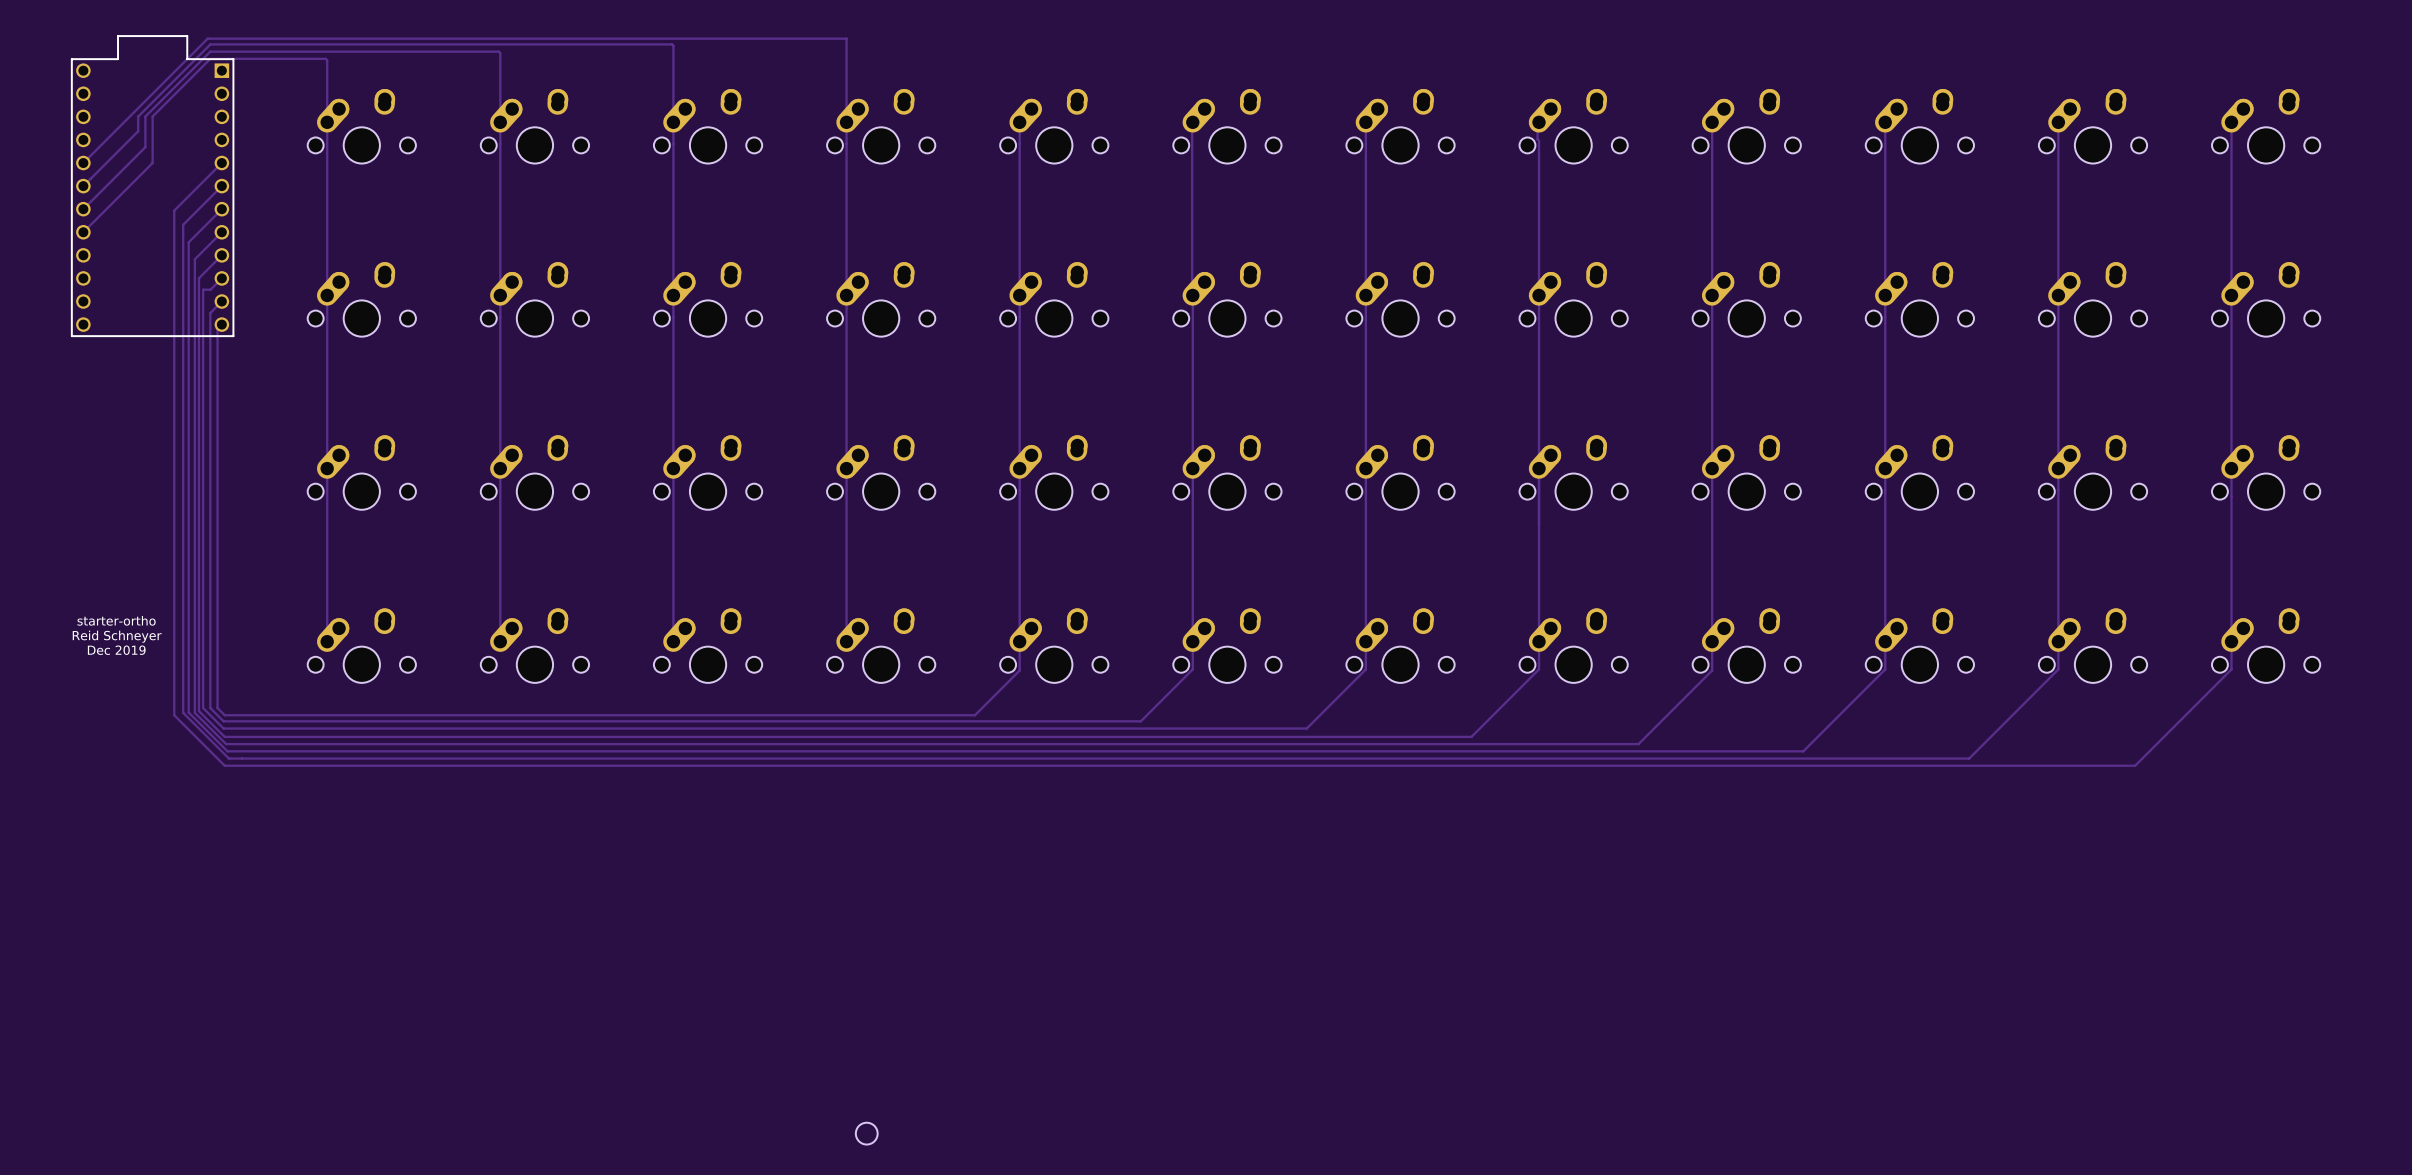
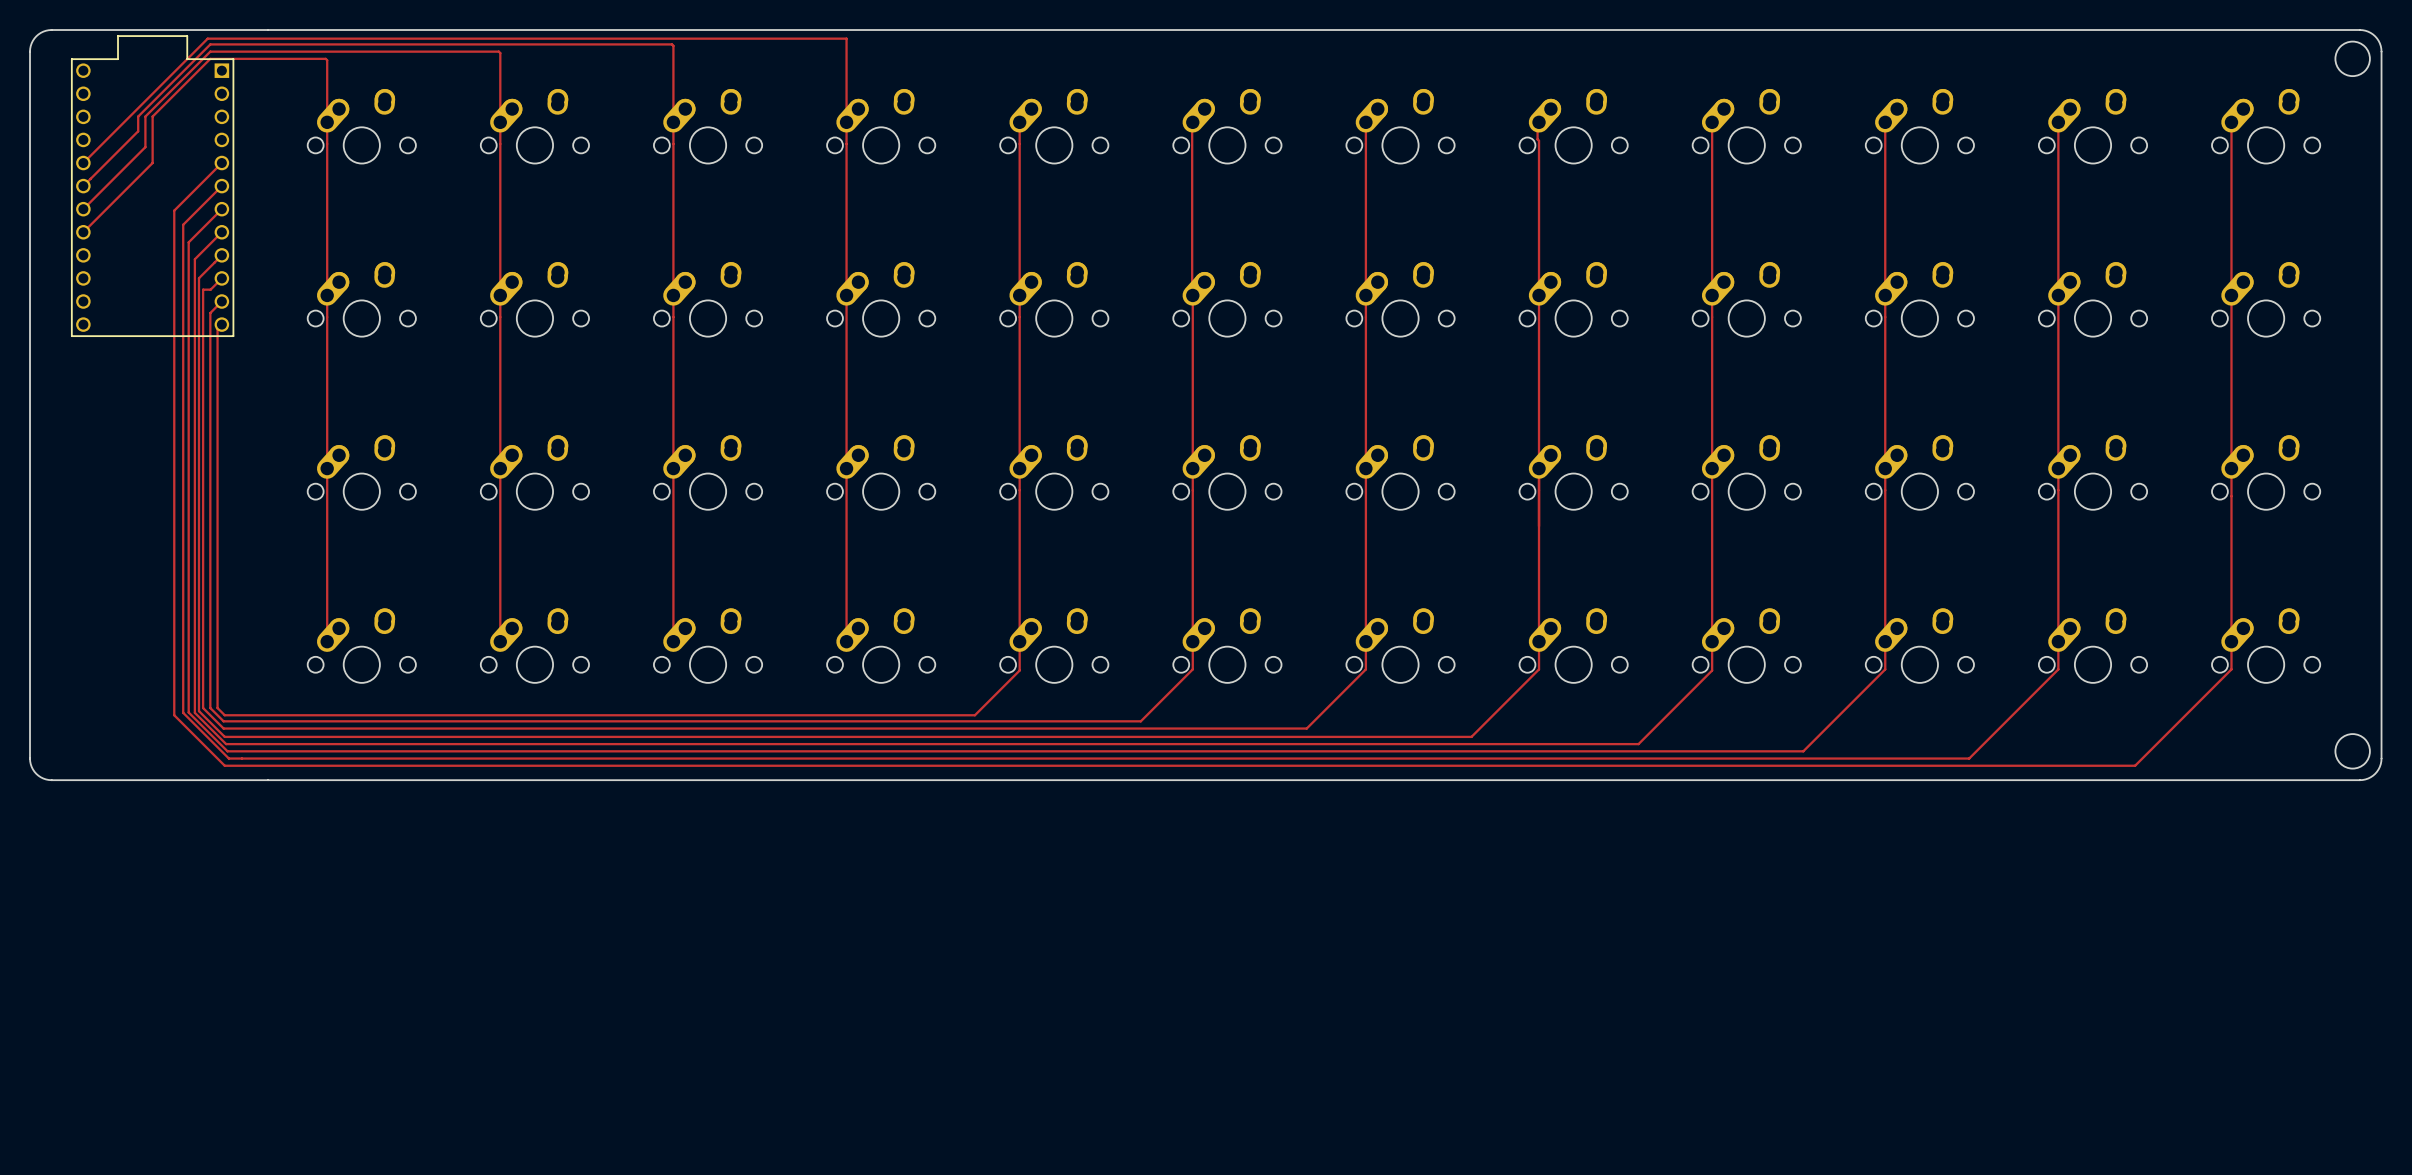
round board edge: none -> [2335, 41, 2371, 77]
text: starter-ortho (116, 620) -> none
text: Reid Schneyer (117, 636) -> none
text: Dec 2019 (116, 650) -> none
round board edge: none -> [2335, 733, 2371, 769]
board edge: none -> (2381, 758) (2381, 51) (2377, 38) (2365, 30) (51, 30) (38, 34) (30, 46) (30, 758) (34, 771) (46, 779) (2359, 780) (2368, 778) (2375, 773) (2379, 766) (2381, 758)
round board edge: [855, 1122, 878, 1145] -> none

